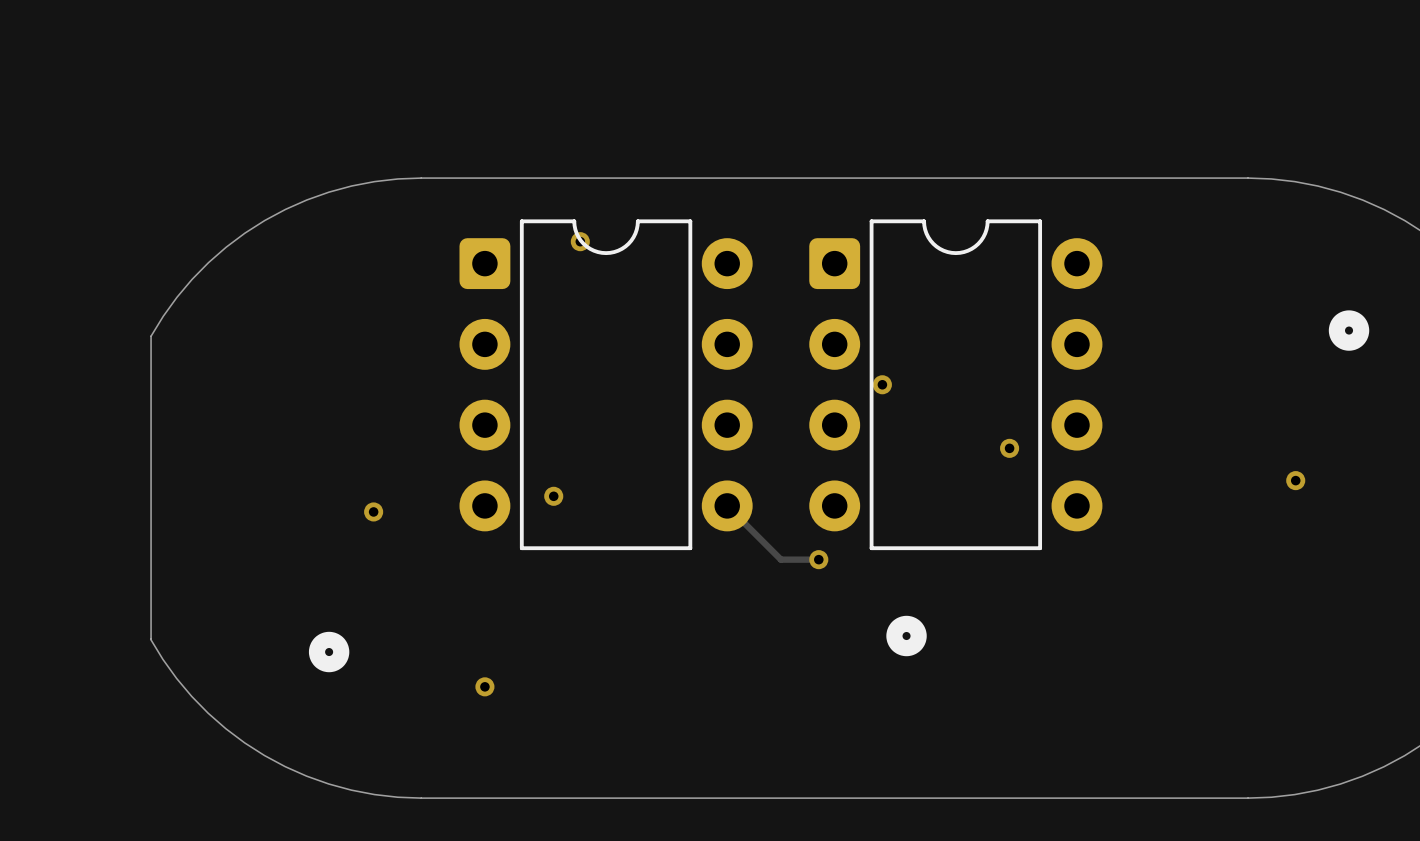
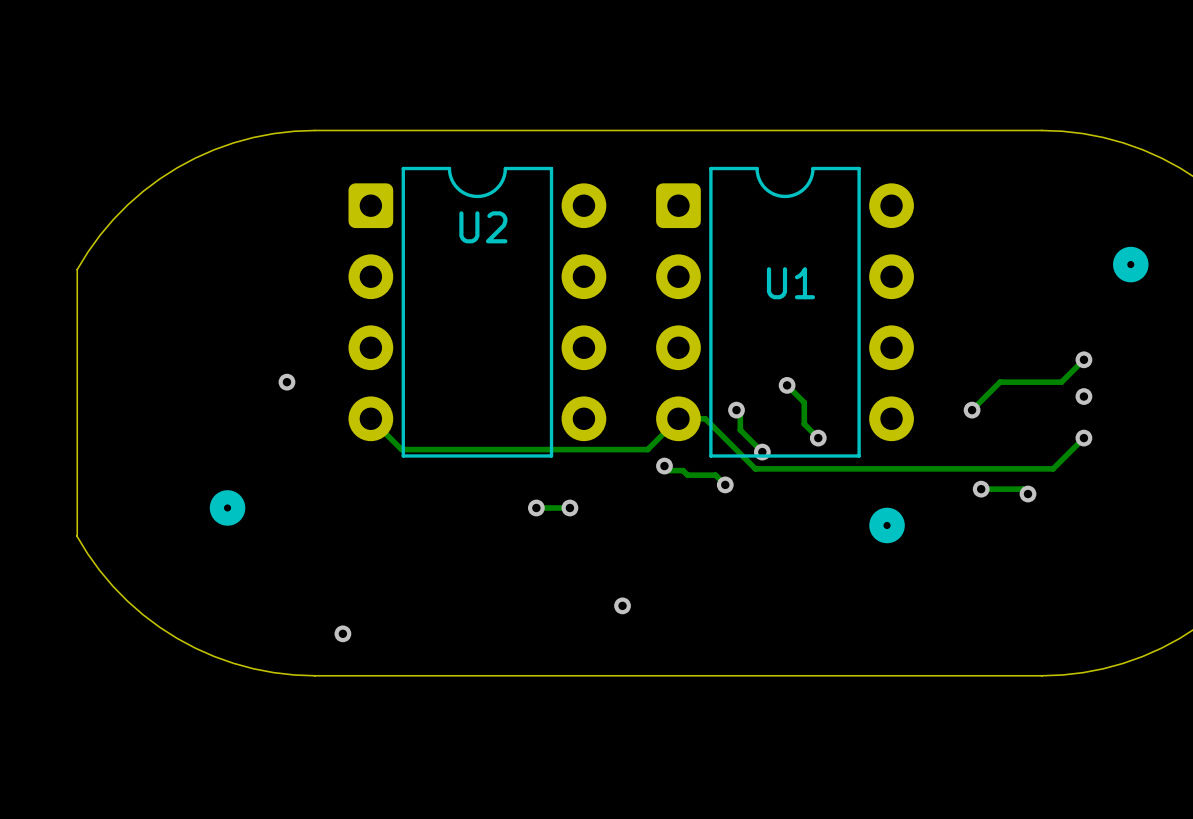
via: (580, 241) -> none
U2 name: none -> U2 (483, 227)
U1 name: none -> U1 (790, 283)
via: (882, 384) -> none
track: none -> (1083, 359) (1061, 382) (1000, 382) (972, 410)
via: none -> (1083, 359)
via: (1009, 448) -> none
track: none -> (787, 385) (804, 402) (804, 424) (818, 438)
via: none -> (787, 385)
via: (553, 496) -> none
track: none -> (736, 410) (740, 413) (740, 430) (762, 452)
via: none -> (736, 410)
via: none -> (972, 410)
track: none -> (370, 418) (401, 449) (647, 449) (678, 418) (705, 418) (755, 468) (1053, 468) (1083, 438)
track: (727, 505) (780, 559) (818, 559) -> none
via position: (373, 511) -> (286, 382)
via: none -> (818, 438)
via: none -> (1083, 438)
via: none -> (762, 452)
track: none -> (664, 470) (683, 470) (687, 475) (715, 475) (725, 484)
via: none -> (725, 484)
track: none -> (981, 489) (1023, 489) (1028, 494)
via: none -> (981, 489)
via: none -> (1028, 494)
via: none -> (536, 507)
track: none -> (569, 507) (536, 507)
via: none -> (569, 507)
part position: (906, 636) -> (887, 525)
part position: (329, 652) -> (227, 507)
via position: (484, 686) -> (342, 633)
via: none -> (622, 605)

